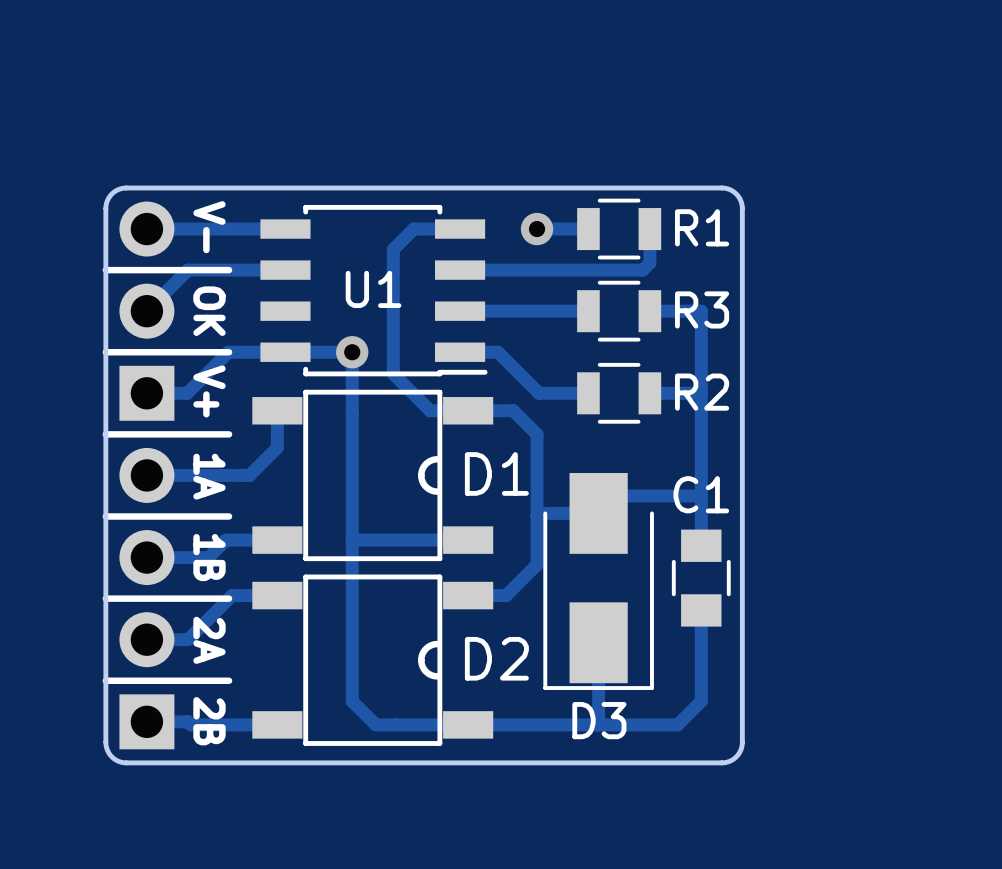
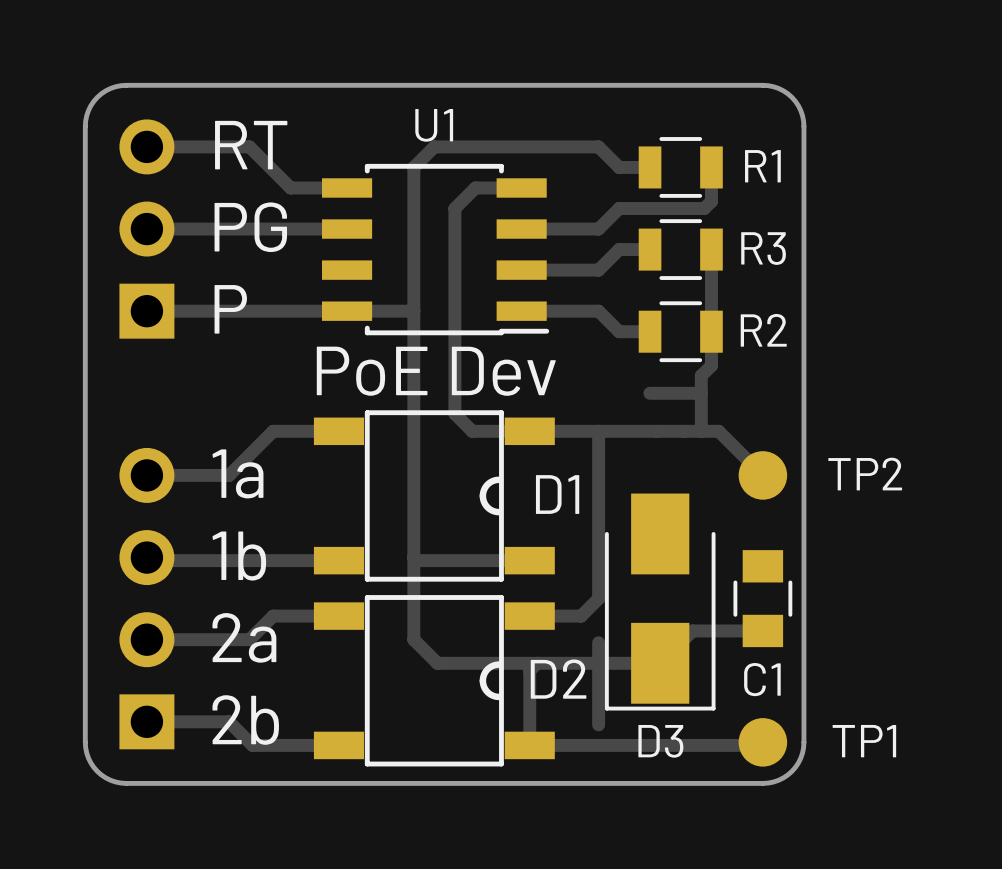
text: none -> RT (251, 145)
track: none -> (146, 146) (249, 146) (290, 187) (347, 187)
track: none -> (650, 167) (619, 167) (598, 146) (434, 146) (413, 167) (413, 639) (437, 663) (660, 663) (692, 630) (762, 630)
track: none -> (711, 167) (711, 201) (704, 208) (619, 208) (598, 229) (588, 229)
track: none -> (521, 187) (475, 187) (454, 208) (454, 413) (472, 431) (718, 431) (762, 475)
text: V- (209, 227) -> PG (250, 227)
track: (460, 229) (413, 229) (393, 249) (393, 373) (430, 410) (513, 410) (537, 434) (537, 564) (506, 595) (468, 595) -> none
via: (537, 229) -> none
R1 position: (619, 229) -> (680, 167)
track: (649, 229) (649, 262) (642, 270) (598, 270) -> (650, 249) (619, 249) (598, 270)
line: (105, 270) (229, 270) -> none
track: (285, 270) (187, 270) (146, 311) -> (413, 311) (146, 311)
track: (460, 270) (521, 270) -> (285, 229) (347, 229)
U1 name position: U1 (373, 289) -> U1 (434, 125)
U1 position: (373, 290) -> (435, 249)
part position: (146, 311) -> (146, 229)
text: OK (209, 311) -> P (230, 309)
track: (460, 311) (521, 311) -> none
track: none -> (588, 311) (598, 311) (619, 331) (650, 331)
R3 position: (619, 311) -> (680, 249)
track: (649, 311) (701, 311) (701, 375) -> (711, 249) (711, 365) (701, 375)
line: (105, 352) (229, 352) -> none
via: (352, 352) -> none
track: (460, 352) (498, 352) (539, 393) (588, 393) -> none
text: none -> PoE Dev (436, 371)
text: V+ (209, 391) -> none
track: (146, 393) (187, 393) (228, 352) (352, 352) (352, 701) (375, 724) (677, 724) (701, 701) (701, 610) -> none
R2 position: (619, 393) -> (680, 331)
track: (277, 410) (277, 447) (249, 475) (229, 475) -> (338, 431) (273, 431) (229, 475)
track: none -> (598, 431) (598, 598) (581, 616) (529, 616)
track: (701, 431) (701, 545) -> none
line: (105, 434) (229, 434) -> none
D1 position: (372, 475) -> (434, 495)
TP2: none -> (762, 475)
text: 1A (209, 476) -> 1a (237, 473)
C1 name position: C1 (701, 494) -> C1 (762, 679)
track: (701, 495) (616, 495) (598, 513) (540, 513) (537, 516) -> none
line: (105, 516) (229, 516) -> none
track: (352, 537) (355, 540) (468, 540) -> (413, 557) (416, 560) (529, 560)
track: (277, 540) (225, 540) (208, 557) (146, 557) -> none
text: 1B (209, 557) -> 1b (239, 556)
track: none -> (149, 560) (338, 560)
C1 position: (701, 578) -> (762, 598)
D3 position: (598, 581) -> (660, 602)
track: (277, 595) (232, 595) (187, 639) -> (338, 616) (273, 616) (249, 639) (187, 639)
line: (105, 598) (229, 598) -> none
text: 2A (209, 640) -> 2a (244, 637)
D2 position: (372, 660) -> (434, 680)
track: none -> (537, 663) (529, 670) (529, 745) (759, 745) (762, 742)
line: (105, 680) (229, 680) -> none
track: (187, 721) (191, 724) (277, 724) -> (187, 721) (229, 721) (252, 745) (338, 745)
text: 2B (209, 721) -> 2b (245, 720)
board edge: (742, 742) (742, 208) (740, 200) (734, 192) (721, 187) (126, 187) (118, 189) (110, 196) (105, 208) (105, 742) (107, 750) (113, 758) (126, 762) (721, 762) (729, 761) (736, 756) (740, 750) (742, 742) -> (126, 85) (110, 88) (97, 97) (88, 110) (85, 126) (85, 742) (88, 758) (97, 771) (110, 780) (126, 783) (762, 783) (778, 780) (791, 771) (800, 758) (803, 742) (803, 126) (800, 110) (791, 97) (778, 88) (762, 85) (126, 85)
TP1: none -> (762, 742)

